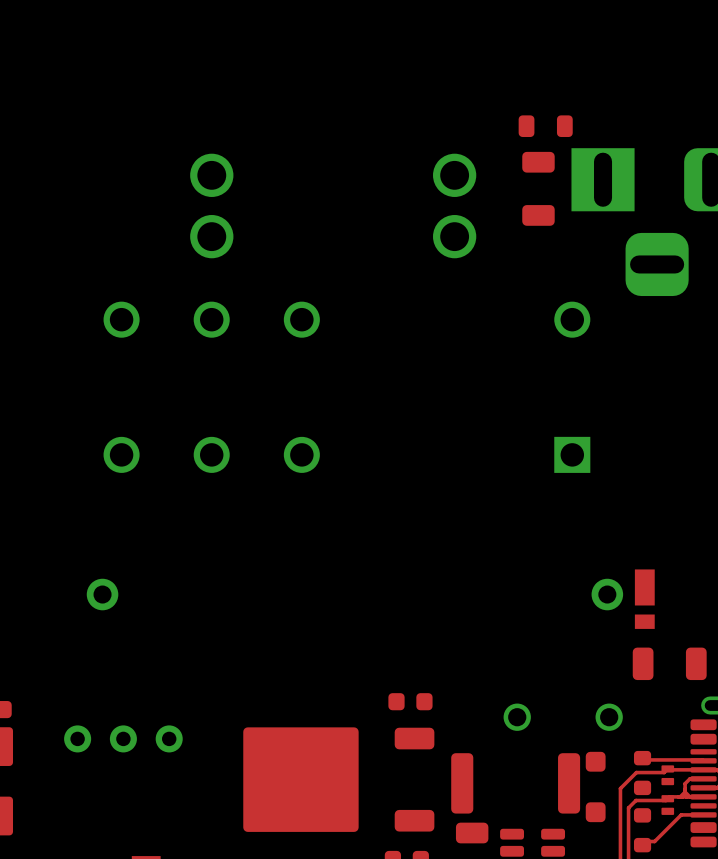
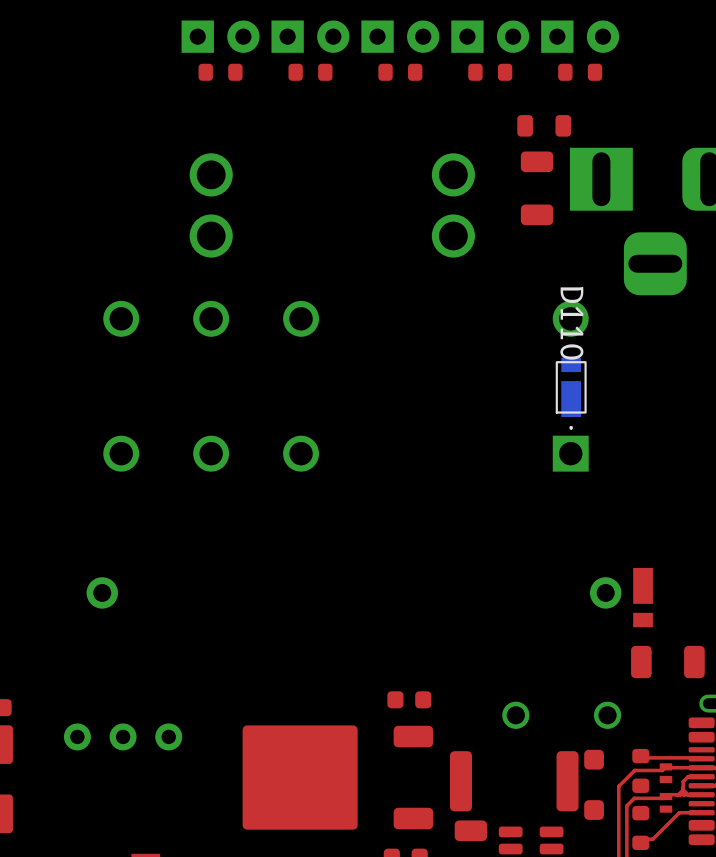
part: none -> (220, 36)
part: none -> (310, 36)
part: none -> (400, 36)
part: none -> (490, 36)
part: none -> (580, 36)
part: none -> (220, 72)
part: none -> (310, 72)
part: none -> (400, 72)
part: none -> (490, 72)
part: none -> (580, 72)
D110: none -> (571, 393)

